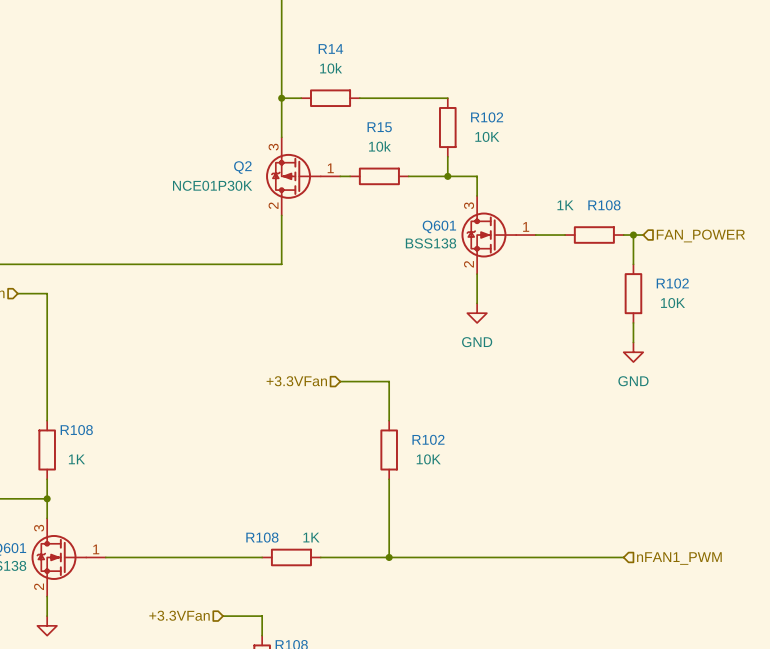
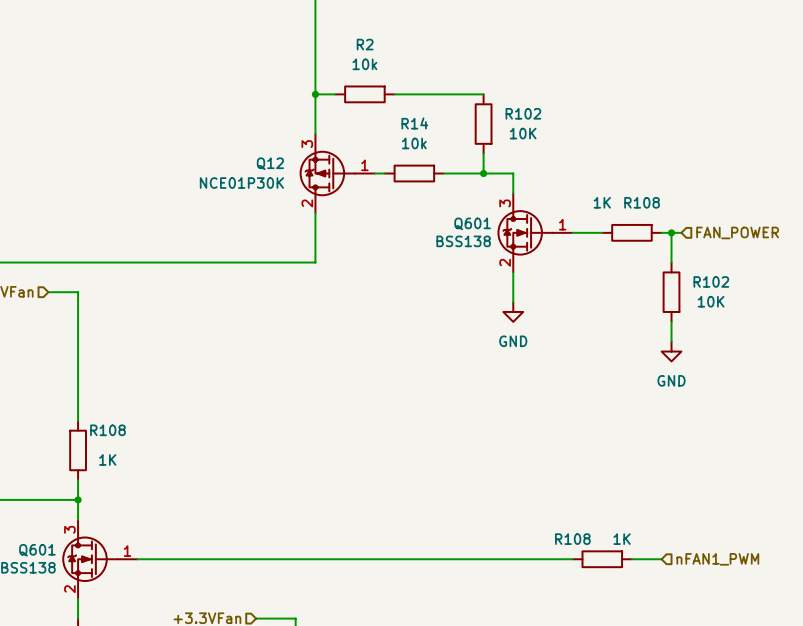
R14 name: R14 (330, 48) -> R2 (365, 44)
R15 name: R15 (379, 127) -> R14 (414, 123)
Q2 name: Q2 (242, 167) -> Q12 (270, 163)
hierarchical label: +3.3VFan (296, 381) -> none
wire: (340, 381) (389, 381) (389, 420) -> none
R102: 10K (389, 449) -> none
wire: (389, 479) (389, 557) -> none
wire: none -> (295, 559) (355, 559)
R108: 1K (291, 557) -> none
junction: (389, 557) -> none
wire: (535, 557) (594, 557) -> none
R108: none -> 1K (602, 559)

